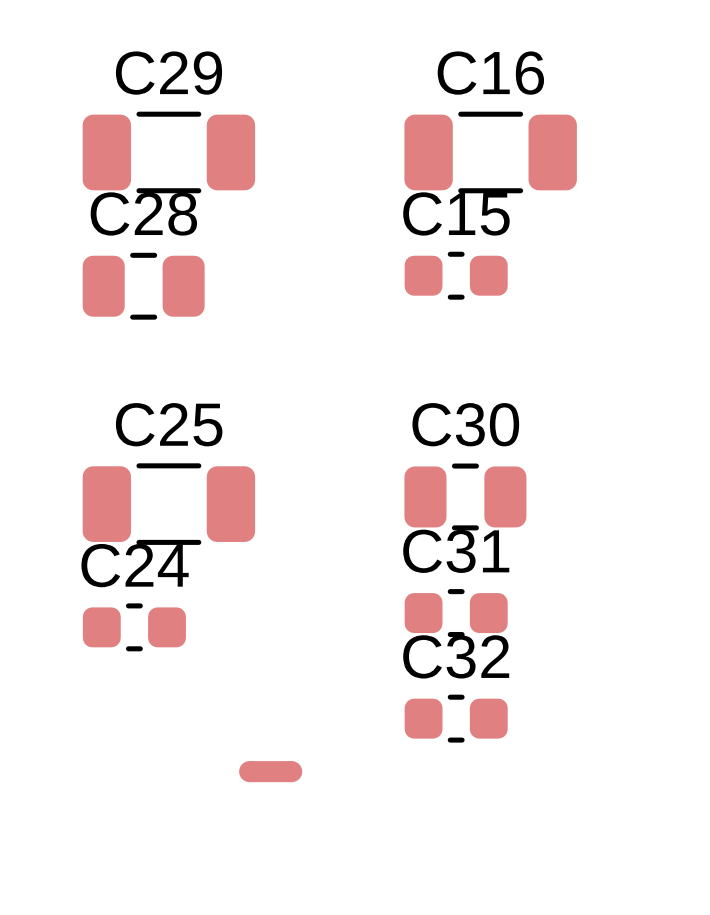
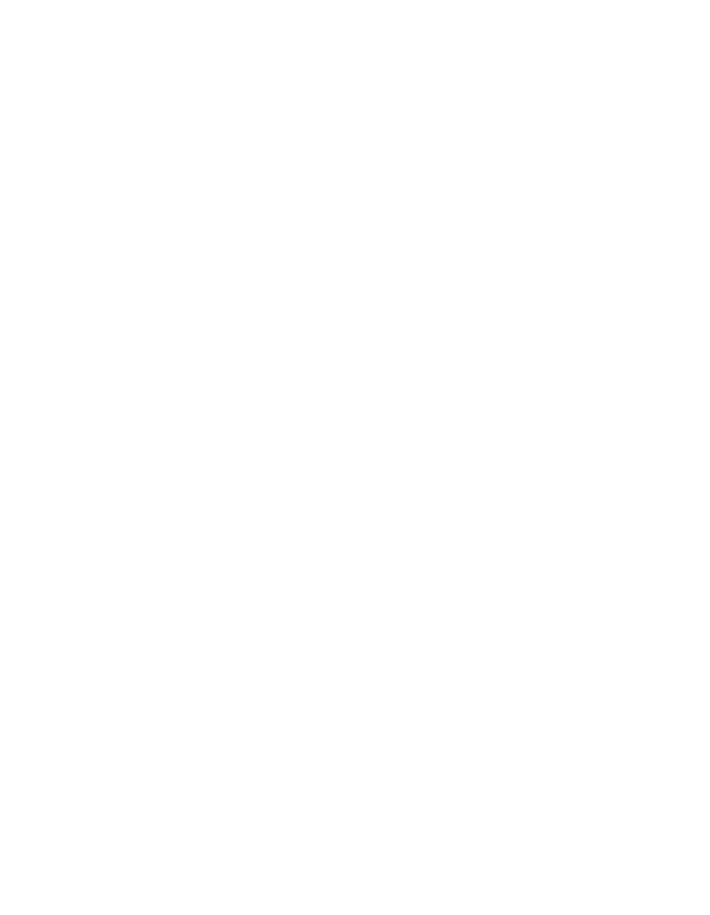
C29: (168, 152) -> none
C16: (490, 152) -> none
C15: (456, 275) -> none
C28: (143, 286) -> none
C30: (465, 496) -> none
C25: (168, 504) -> none
C31: (456, 613) -> none
C24: (134, 627) -> none
C32: (456, 718) -> none
part: (270, 771) -> none

